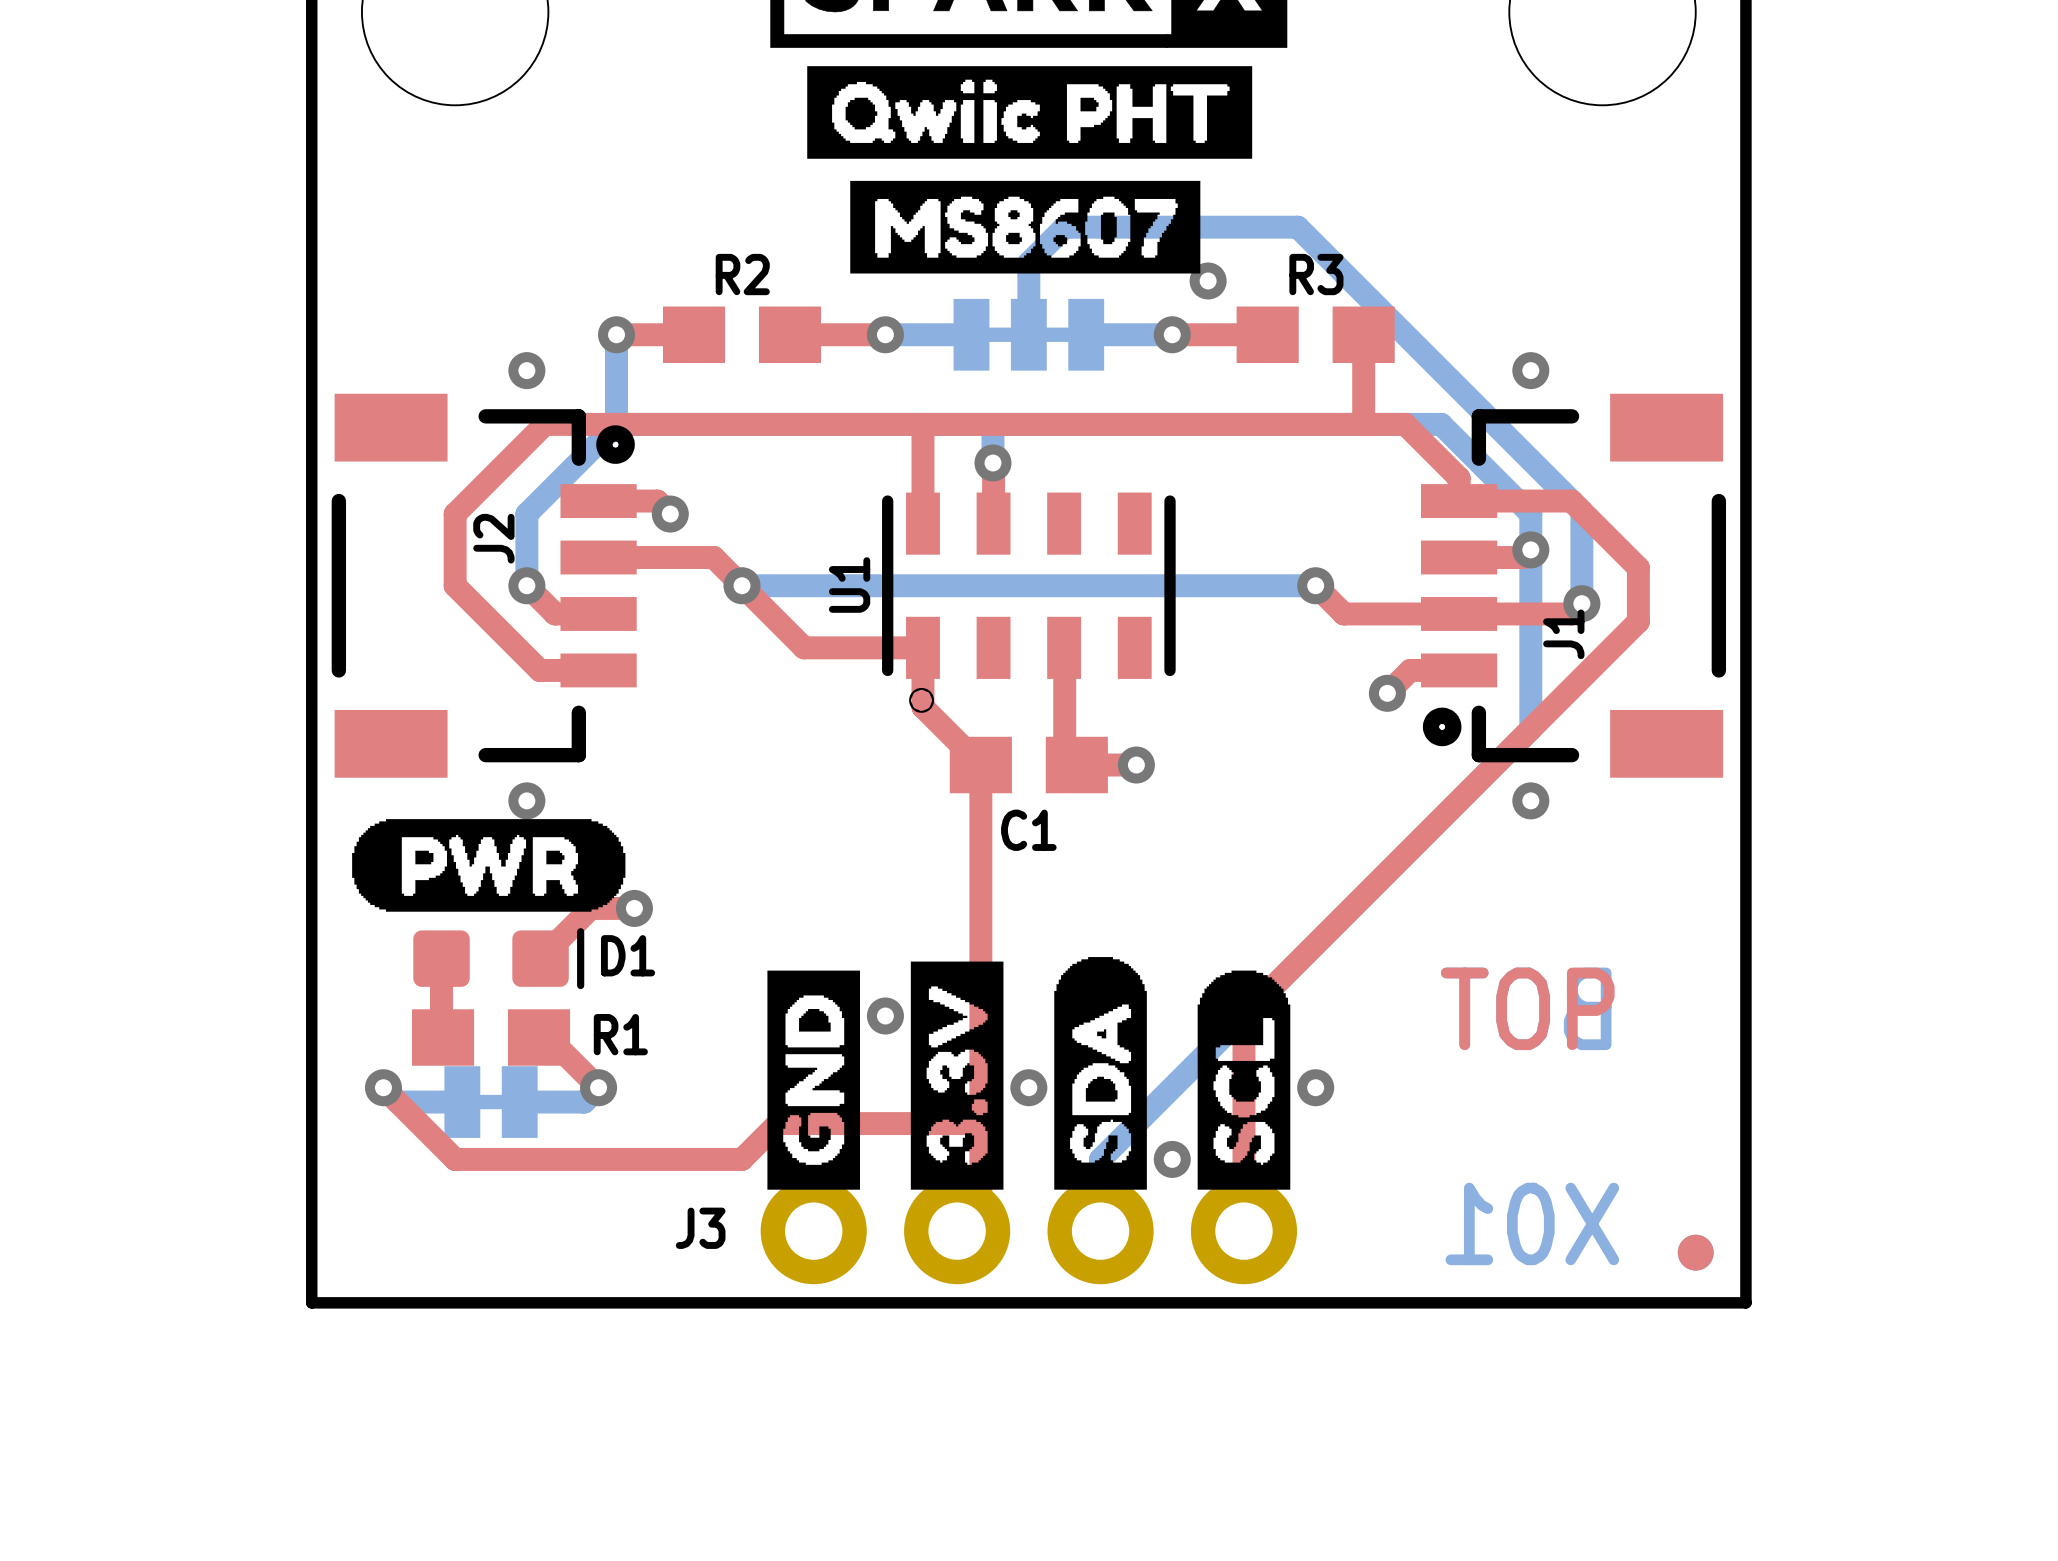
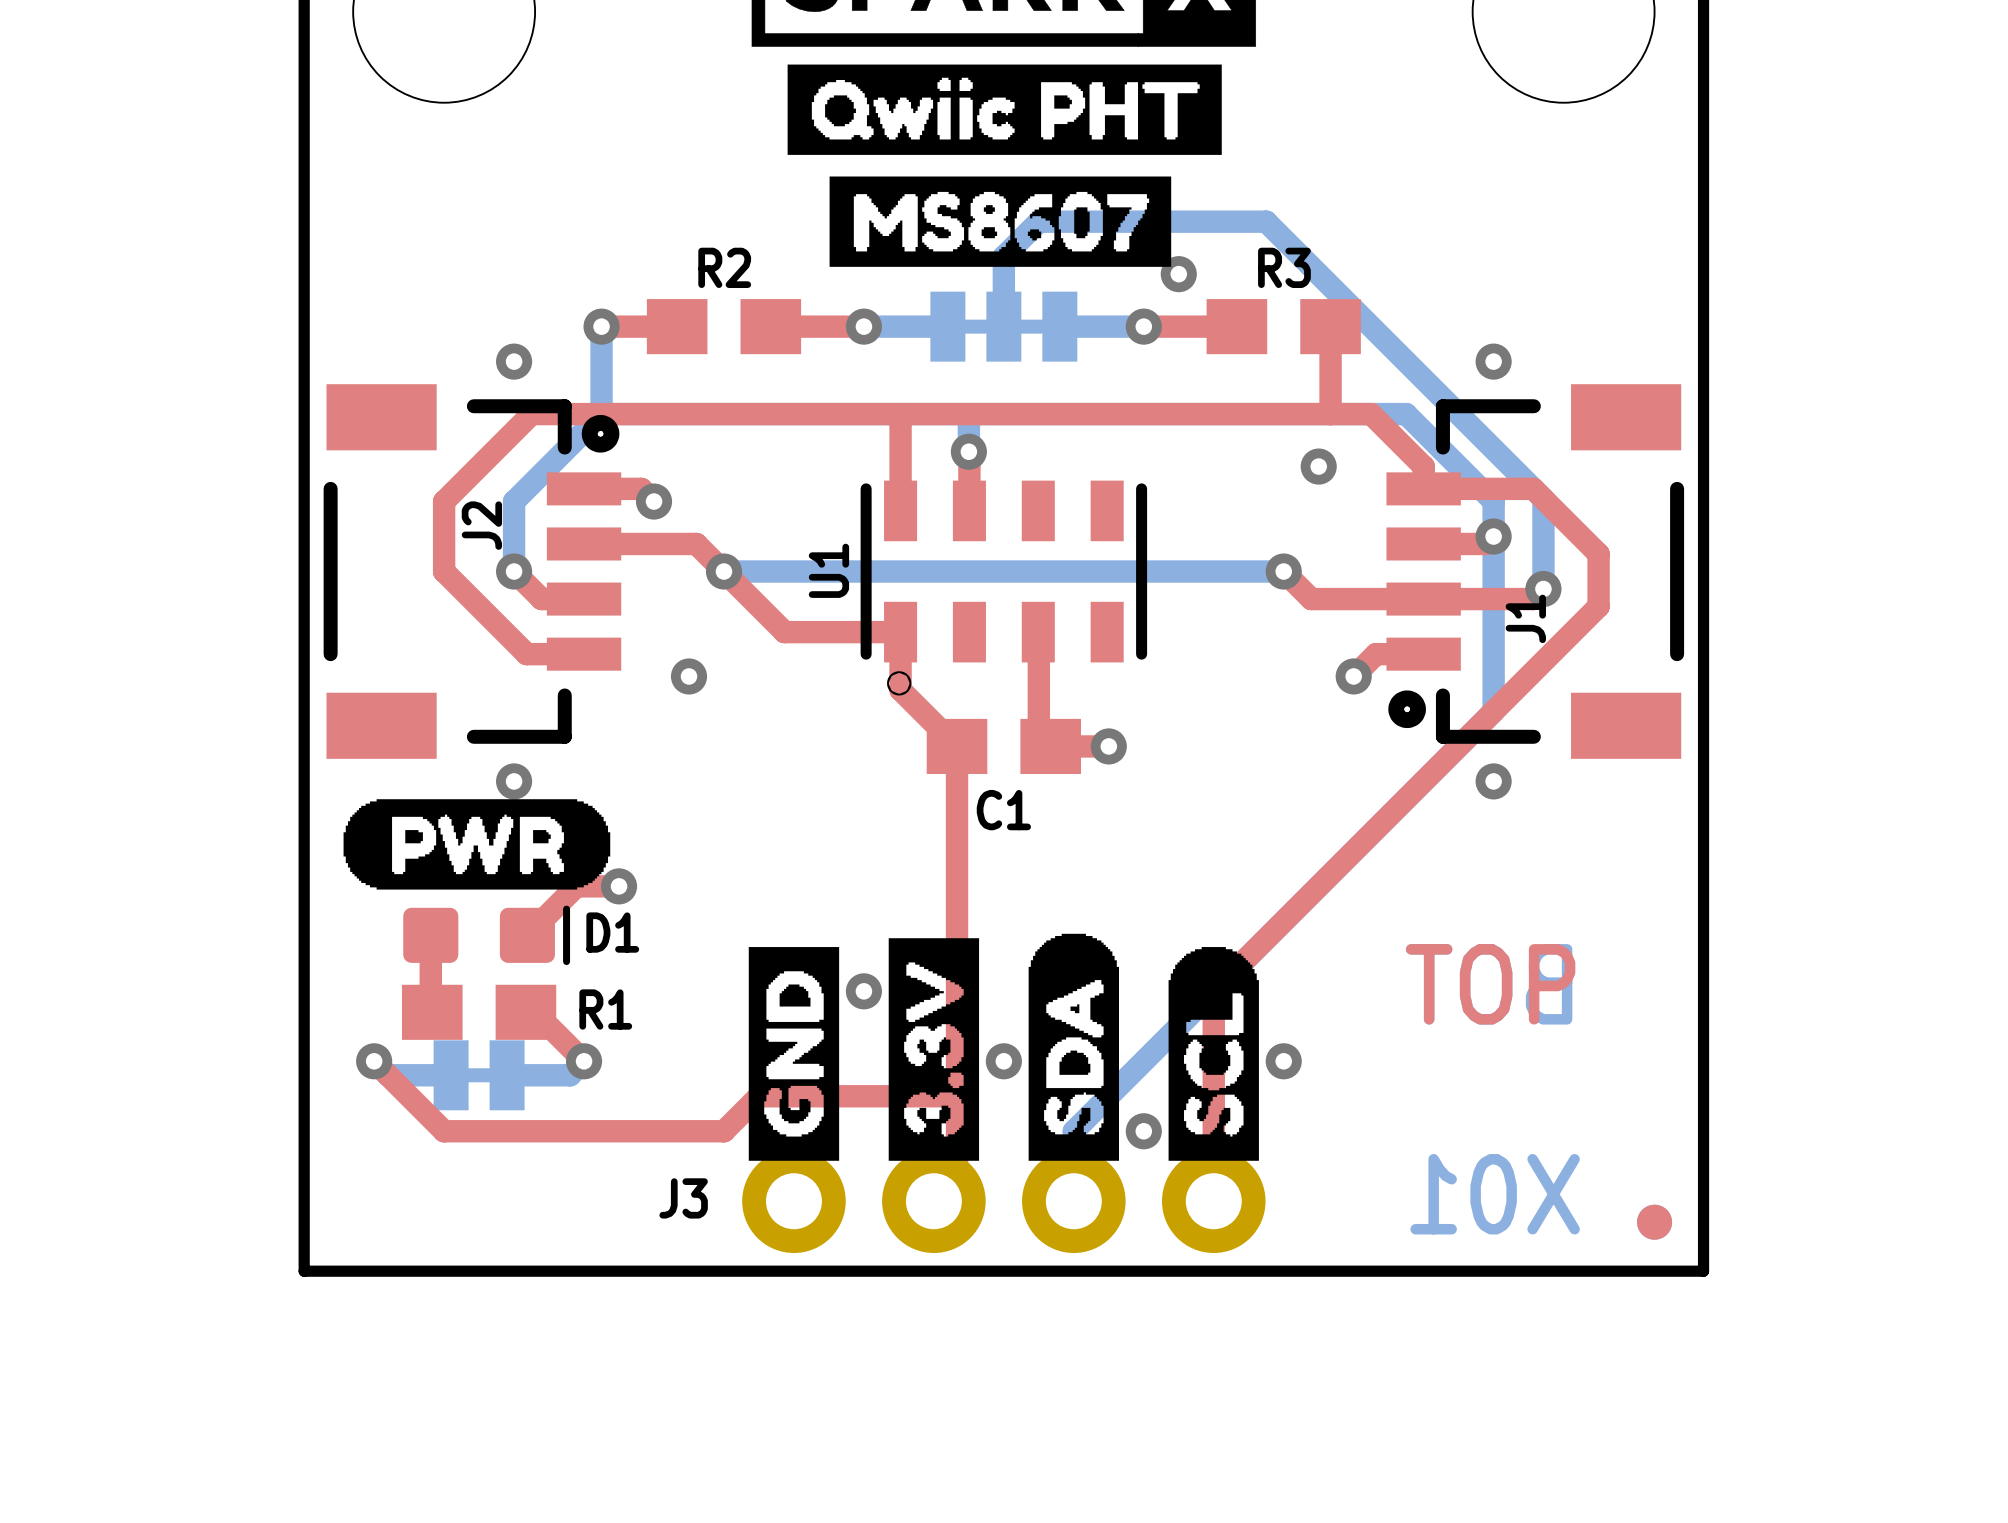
via: none -> (1318, 466)
via: none -> (689, 676)

